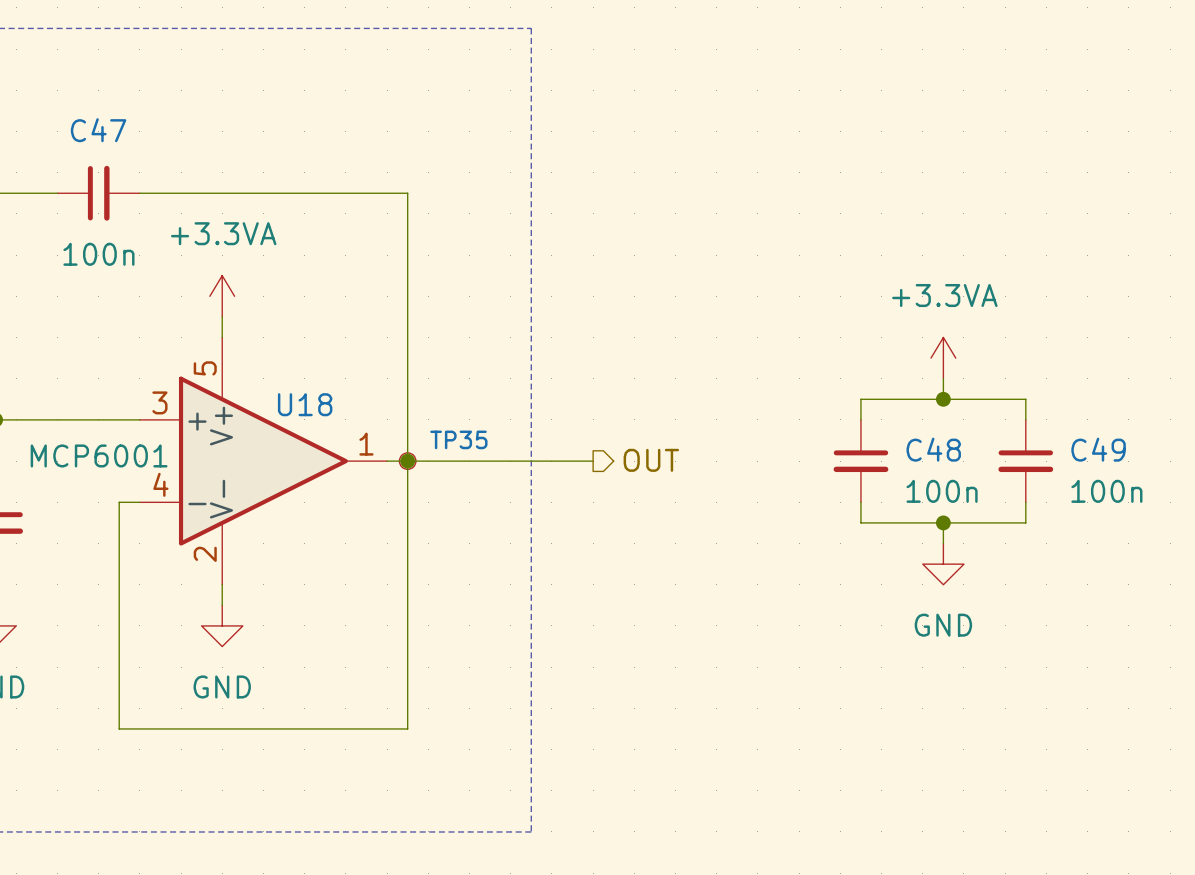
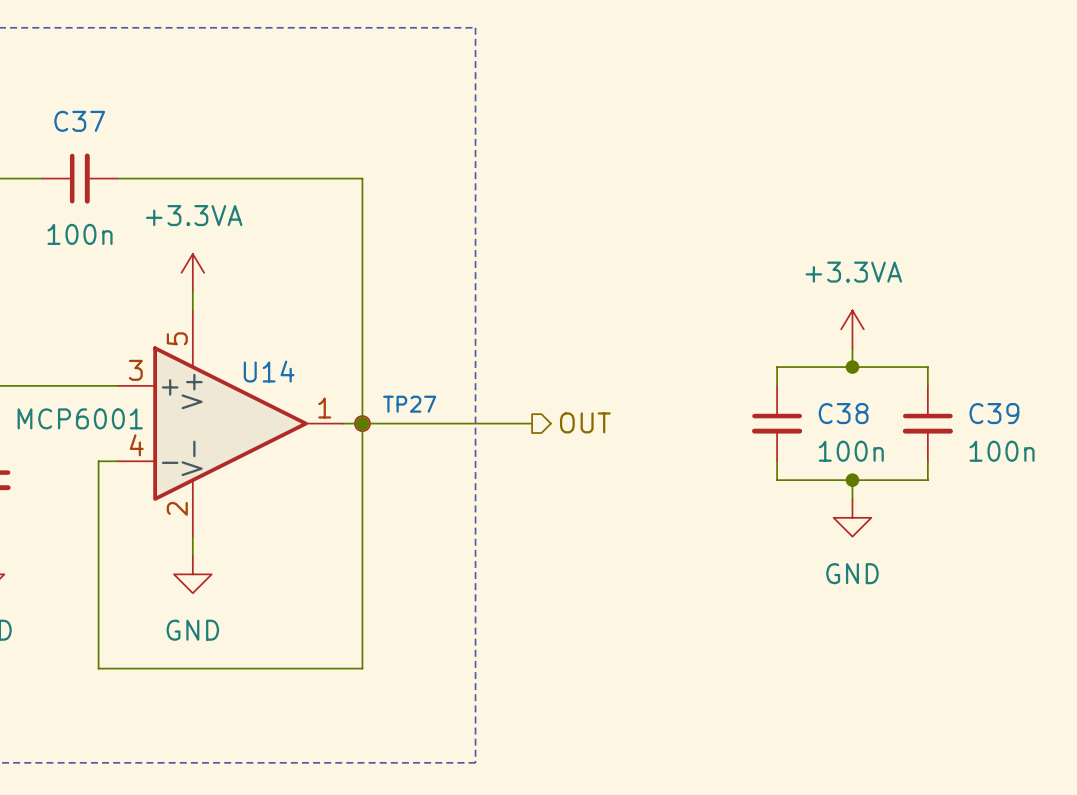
C47 name: C47 (98, 130) -> C37 (79, 121)
U18 name: U18 (305, 404) -> U14 (269, 371)
TP35 name: TP35 (458, 439) -> TP27 (409, 404)
C48 name: C48 (933, 449) -> C38 (843, 413)
C49 name: C49 (1098, 449) -> C39 (994, 413)

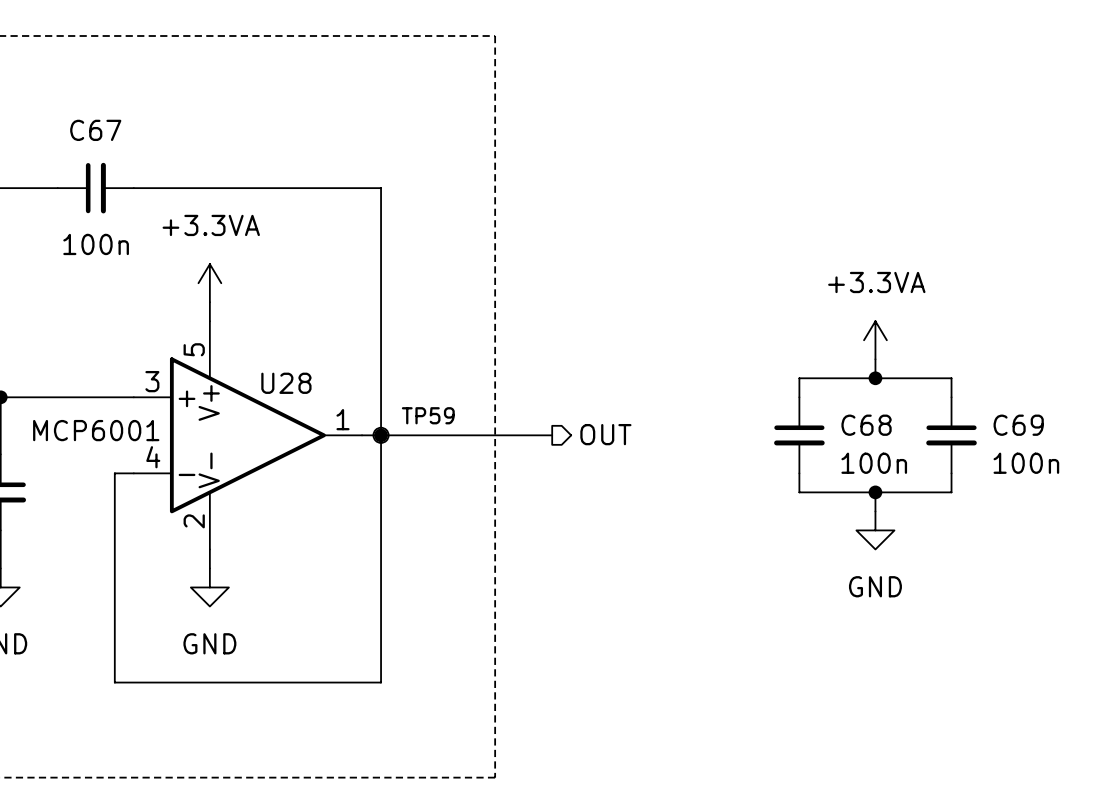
C37 name: C37 (79, 121) -> C67 (95, 130)
U14 name: U14 (269, 371) -> U28 (286, 383)
TP27 name: TP27 (409, 404) -> TP59 (428, 415)
C38 name: C38 (843, 413) -> C68 (866, 425)
C39 name: C39 (994, 413) -> C69 (1018, 425)

